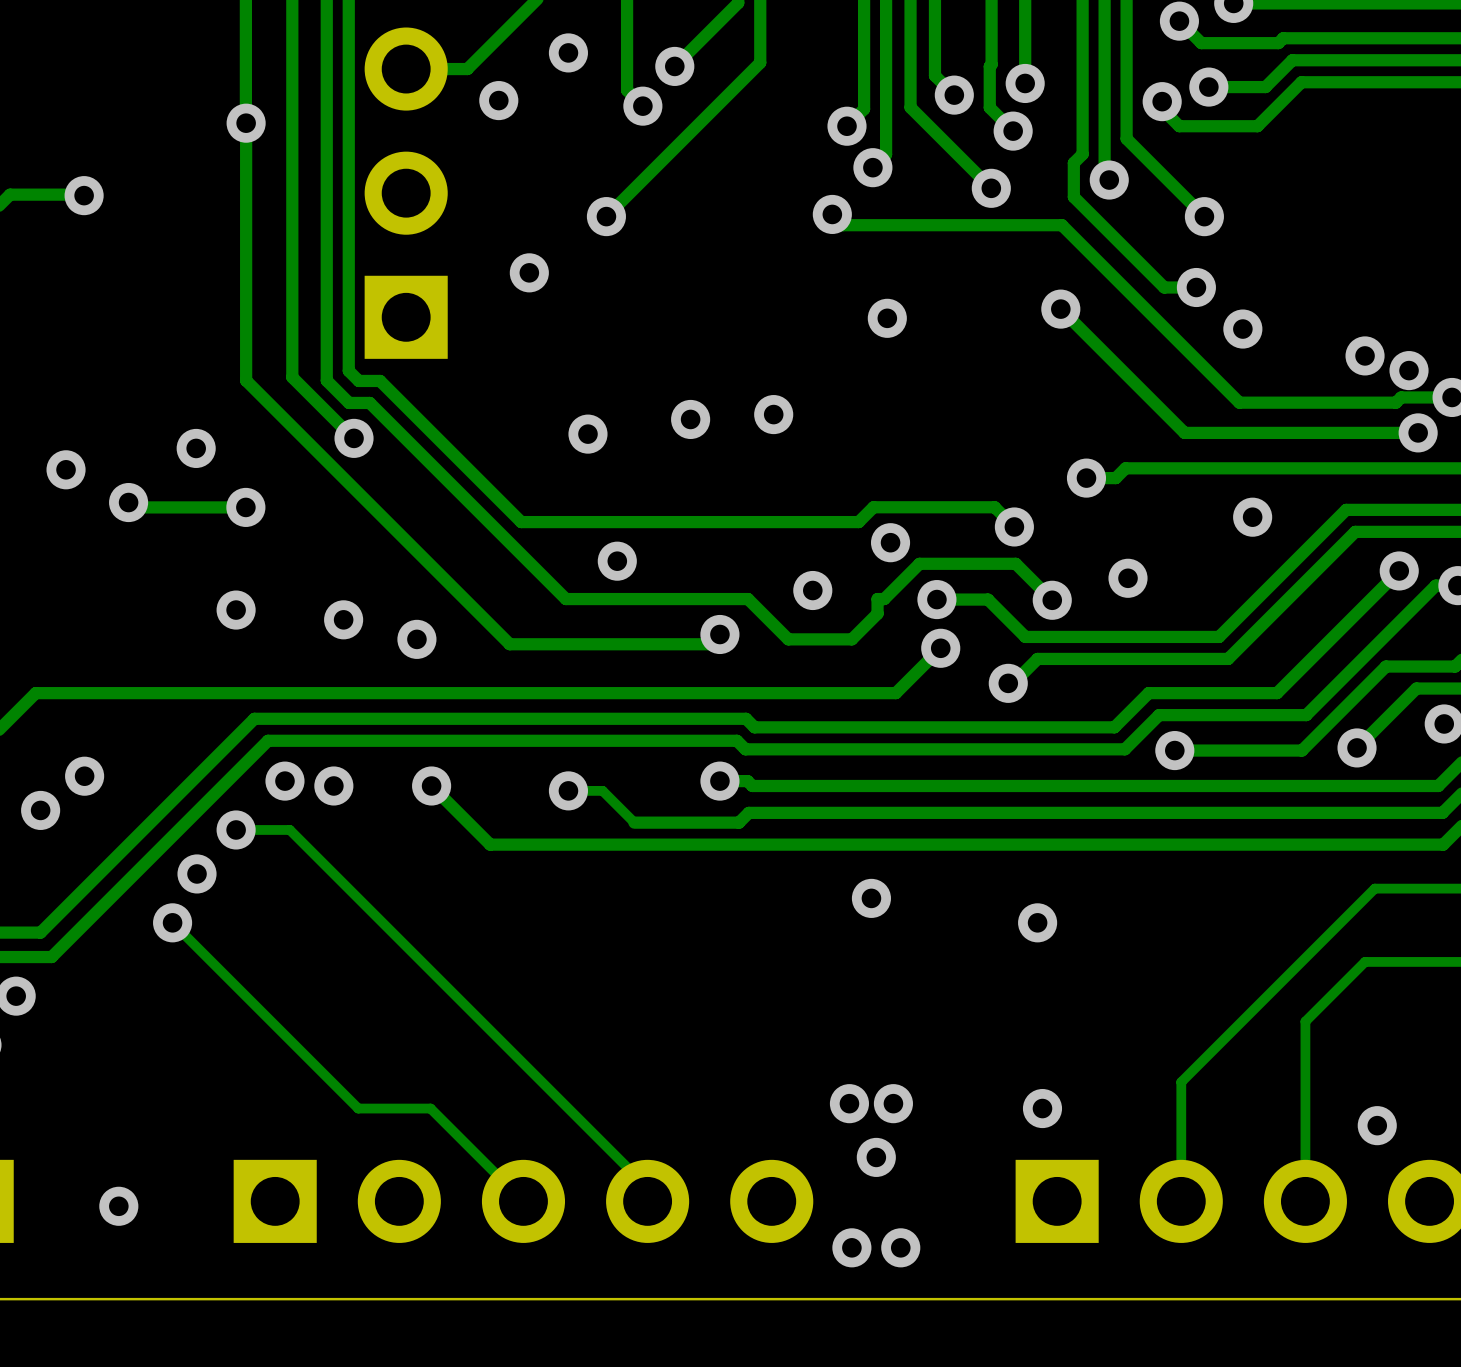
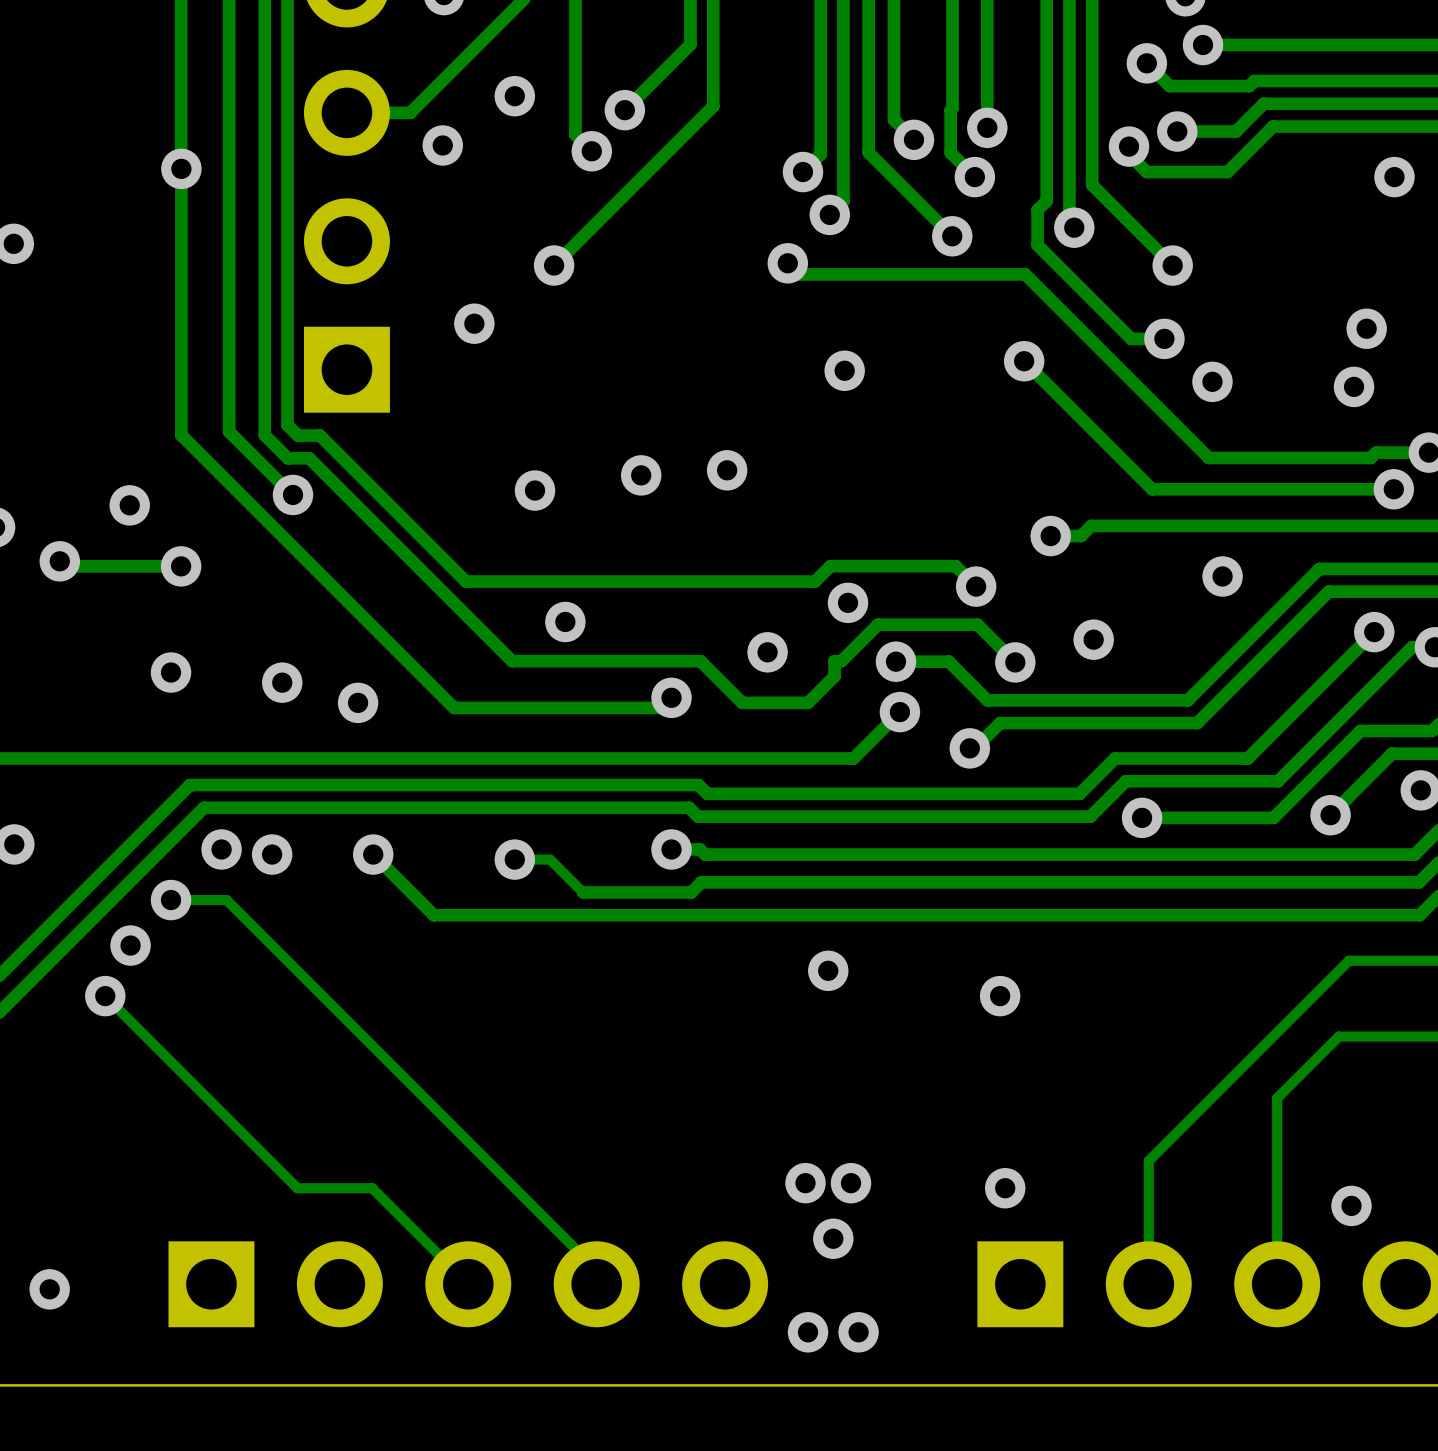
via: none -> (1394, 177)
via: none -> (1366, 328)
via: none -> (1354, 386)
via: (1365, 355) -> none
via: (1409, 370) -> none

